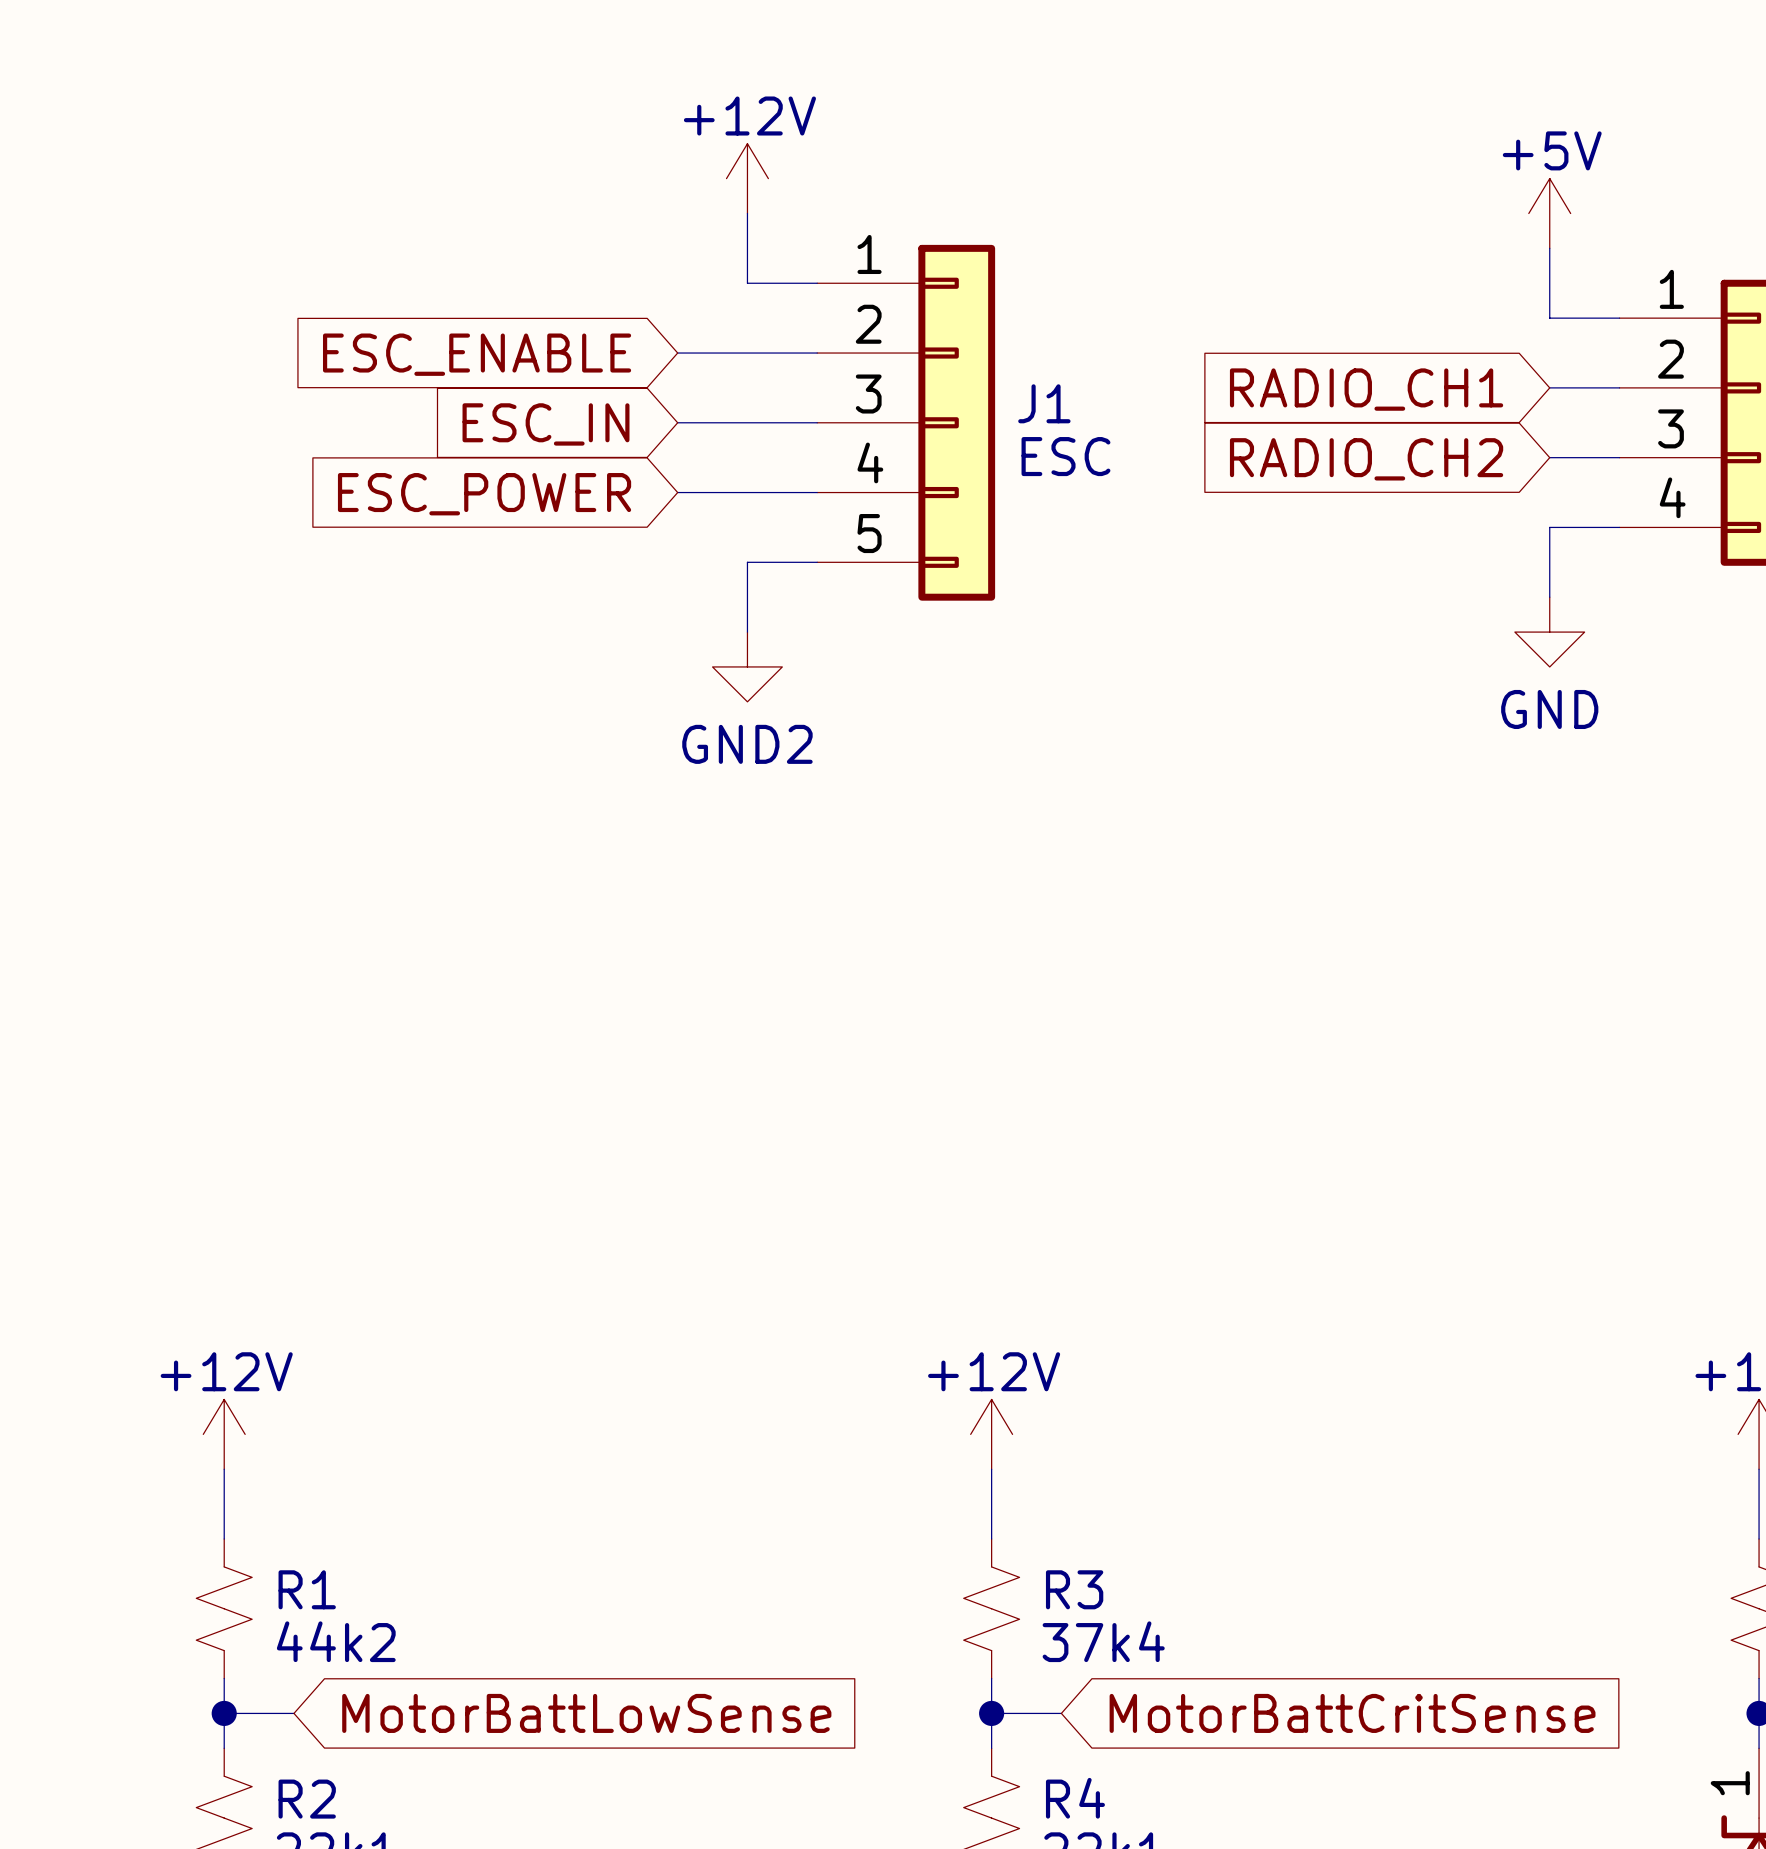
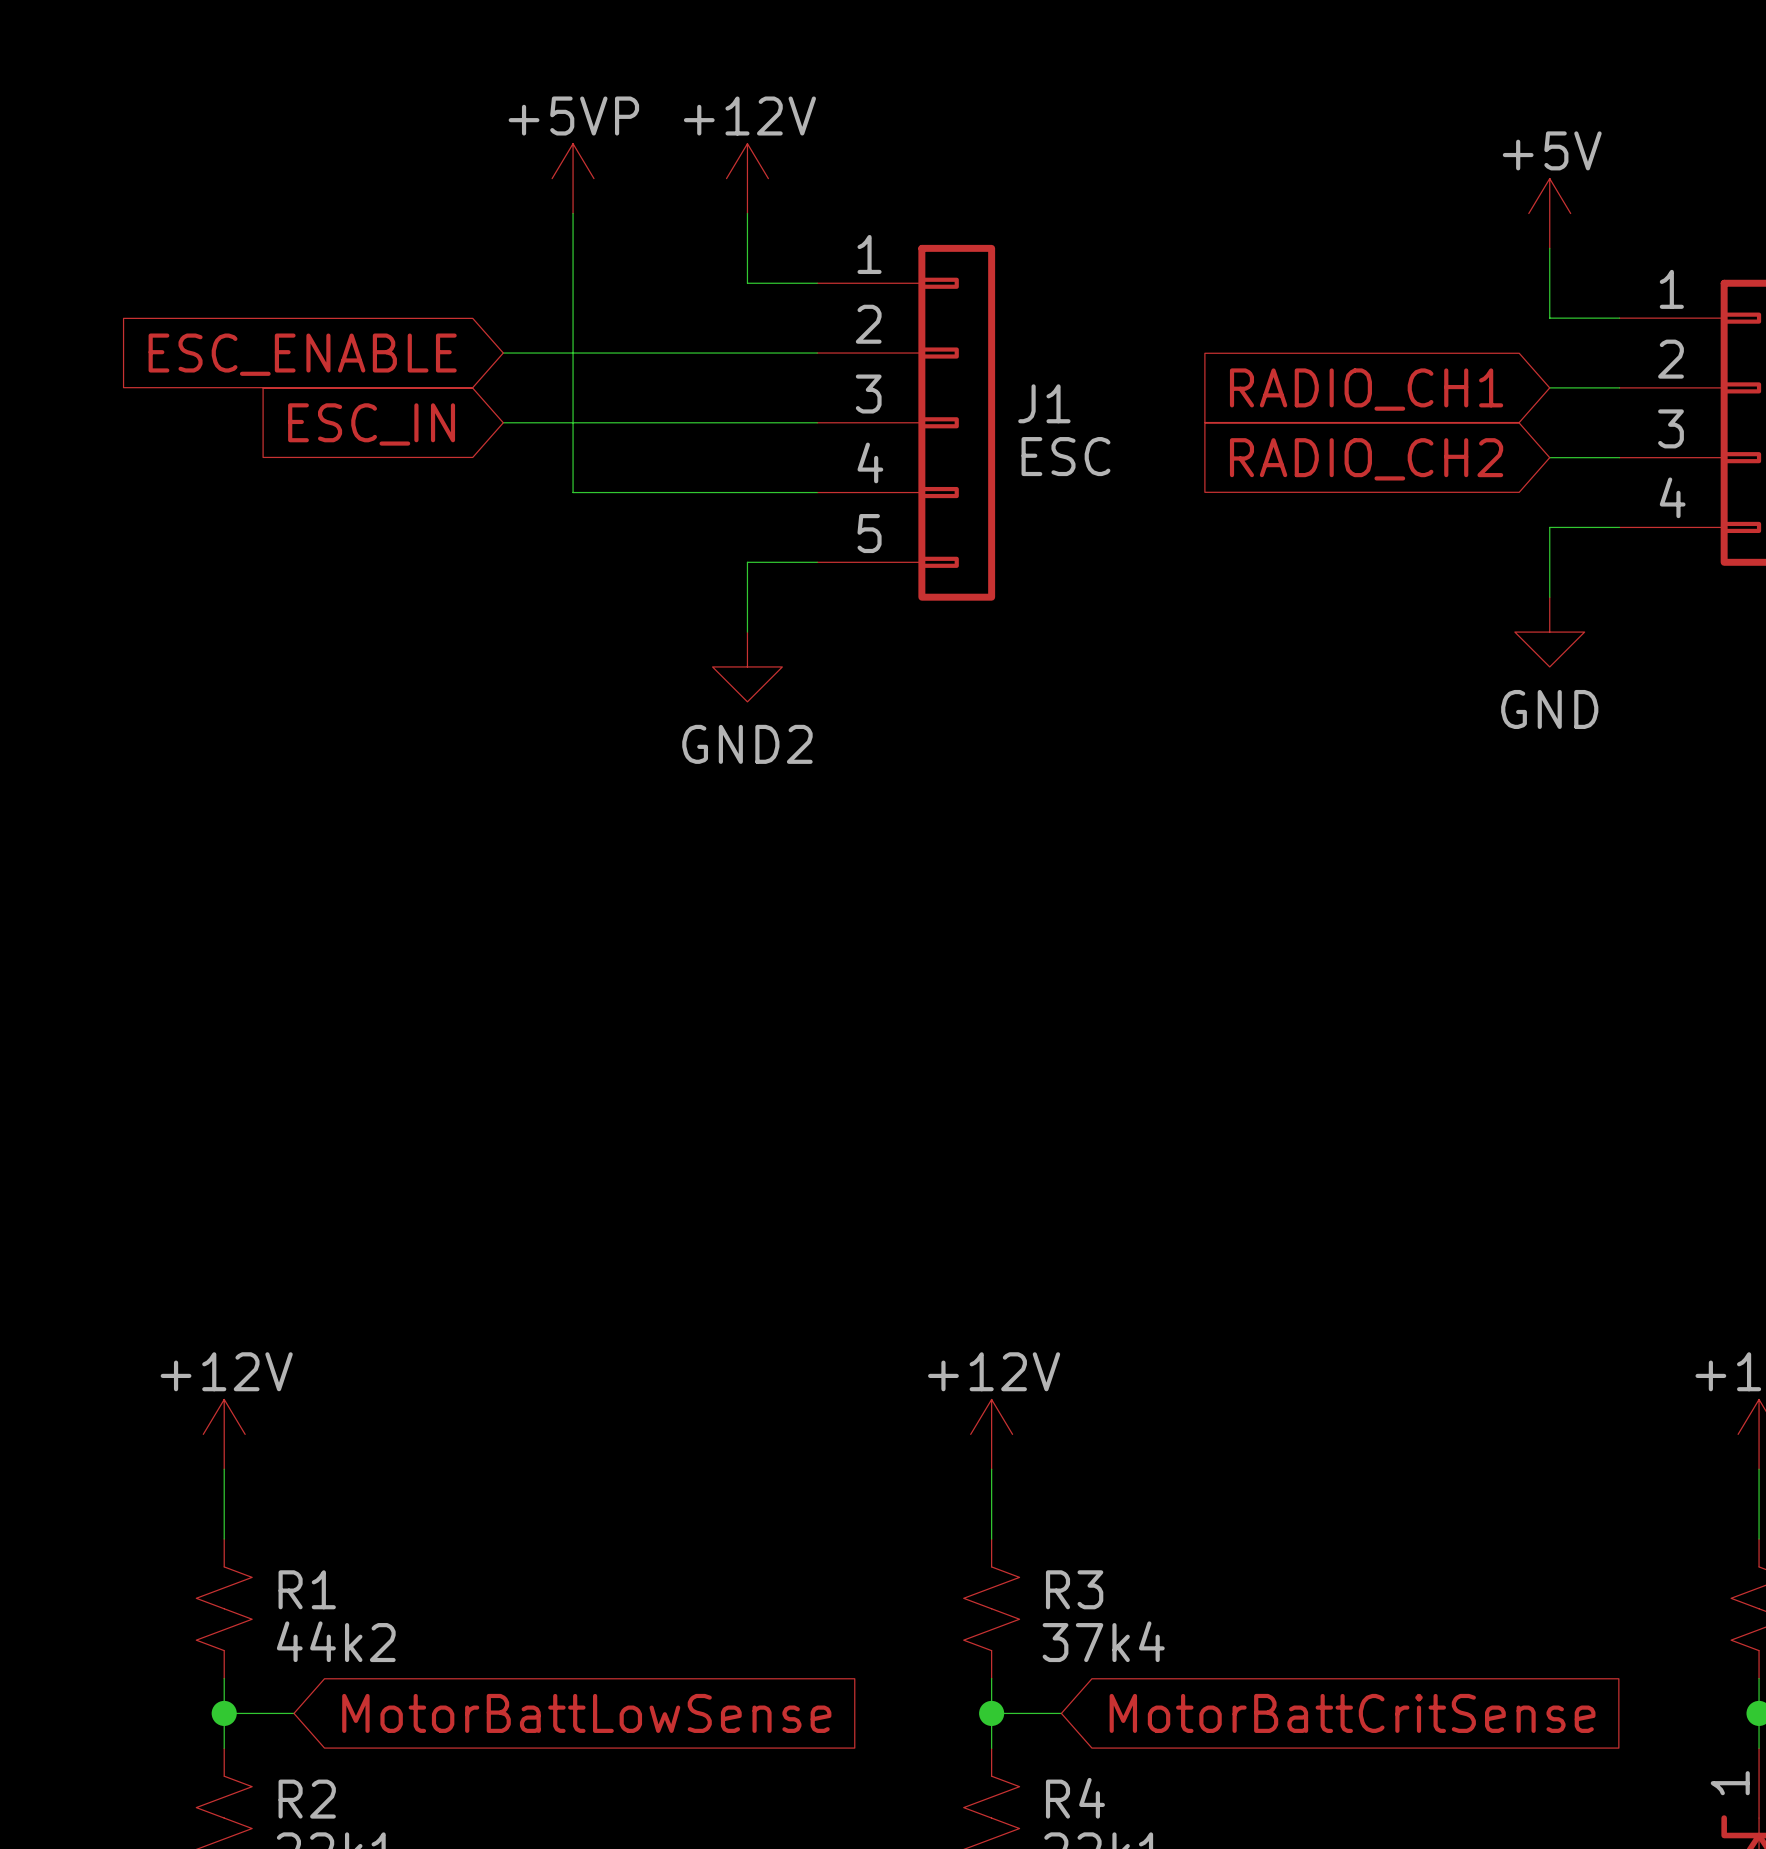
power symbol: none -> +5VP (573, 178)
wire: none -> (573, 213) (573, 492) (677, 492)
wire: none -> (503, 353) (677, 353)
global label position: ESC_ENABLE (477, 354) -> ESC_ENABLE (302, 354)
wire: none -> (503, 422) (677, 422)
global label position: ESC_IN (545, 424) -> ESC_IN (371, 424)
global label: ESC_POWER (484, 494) -> none

